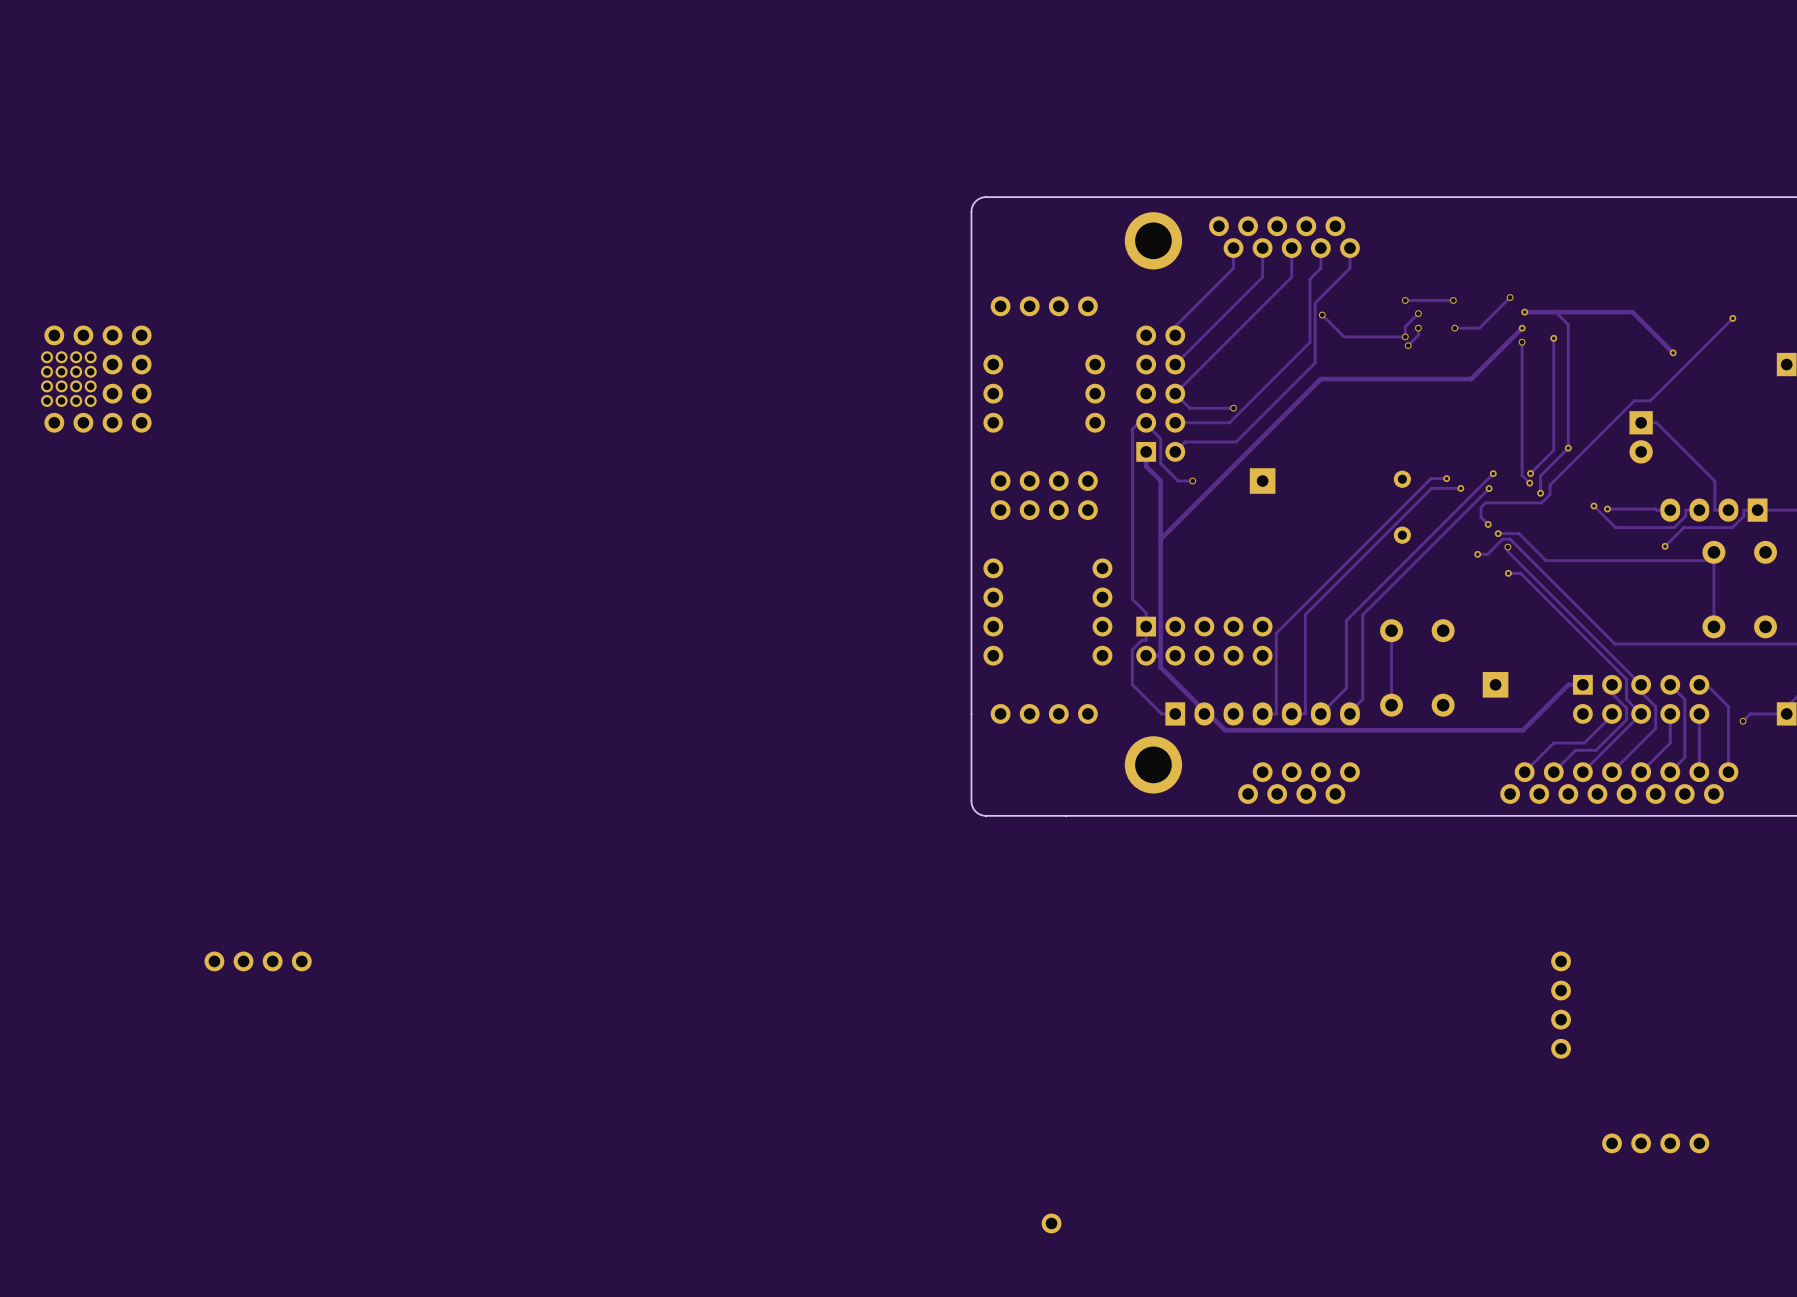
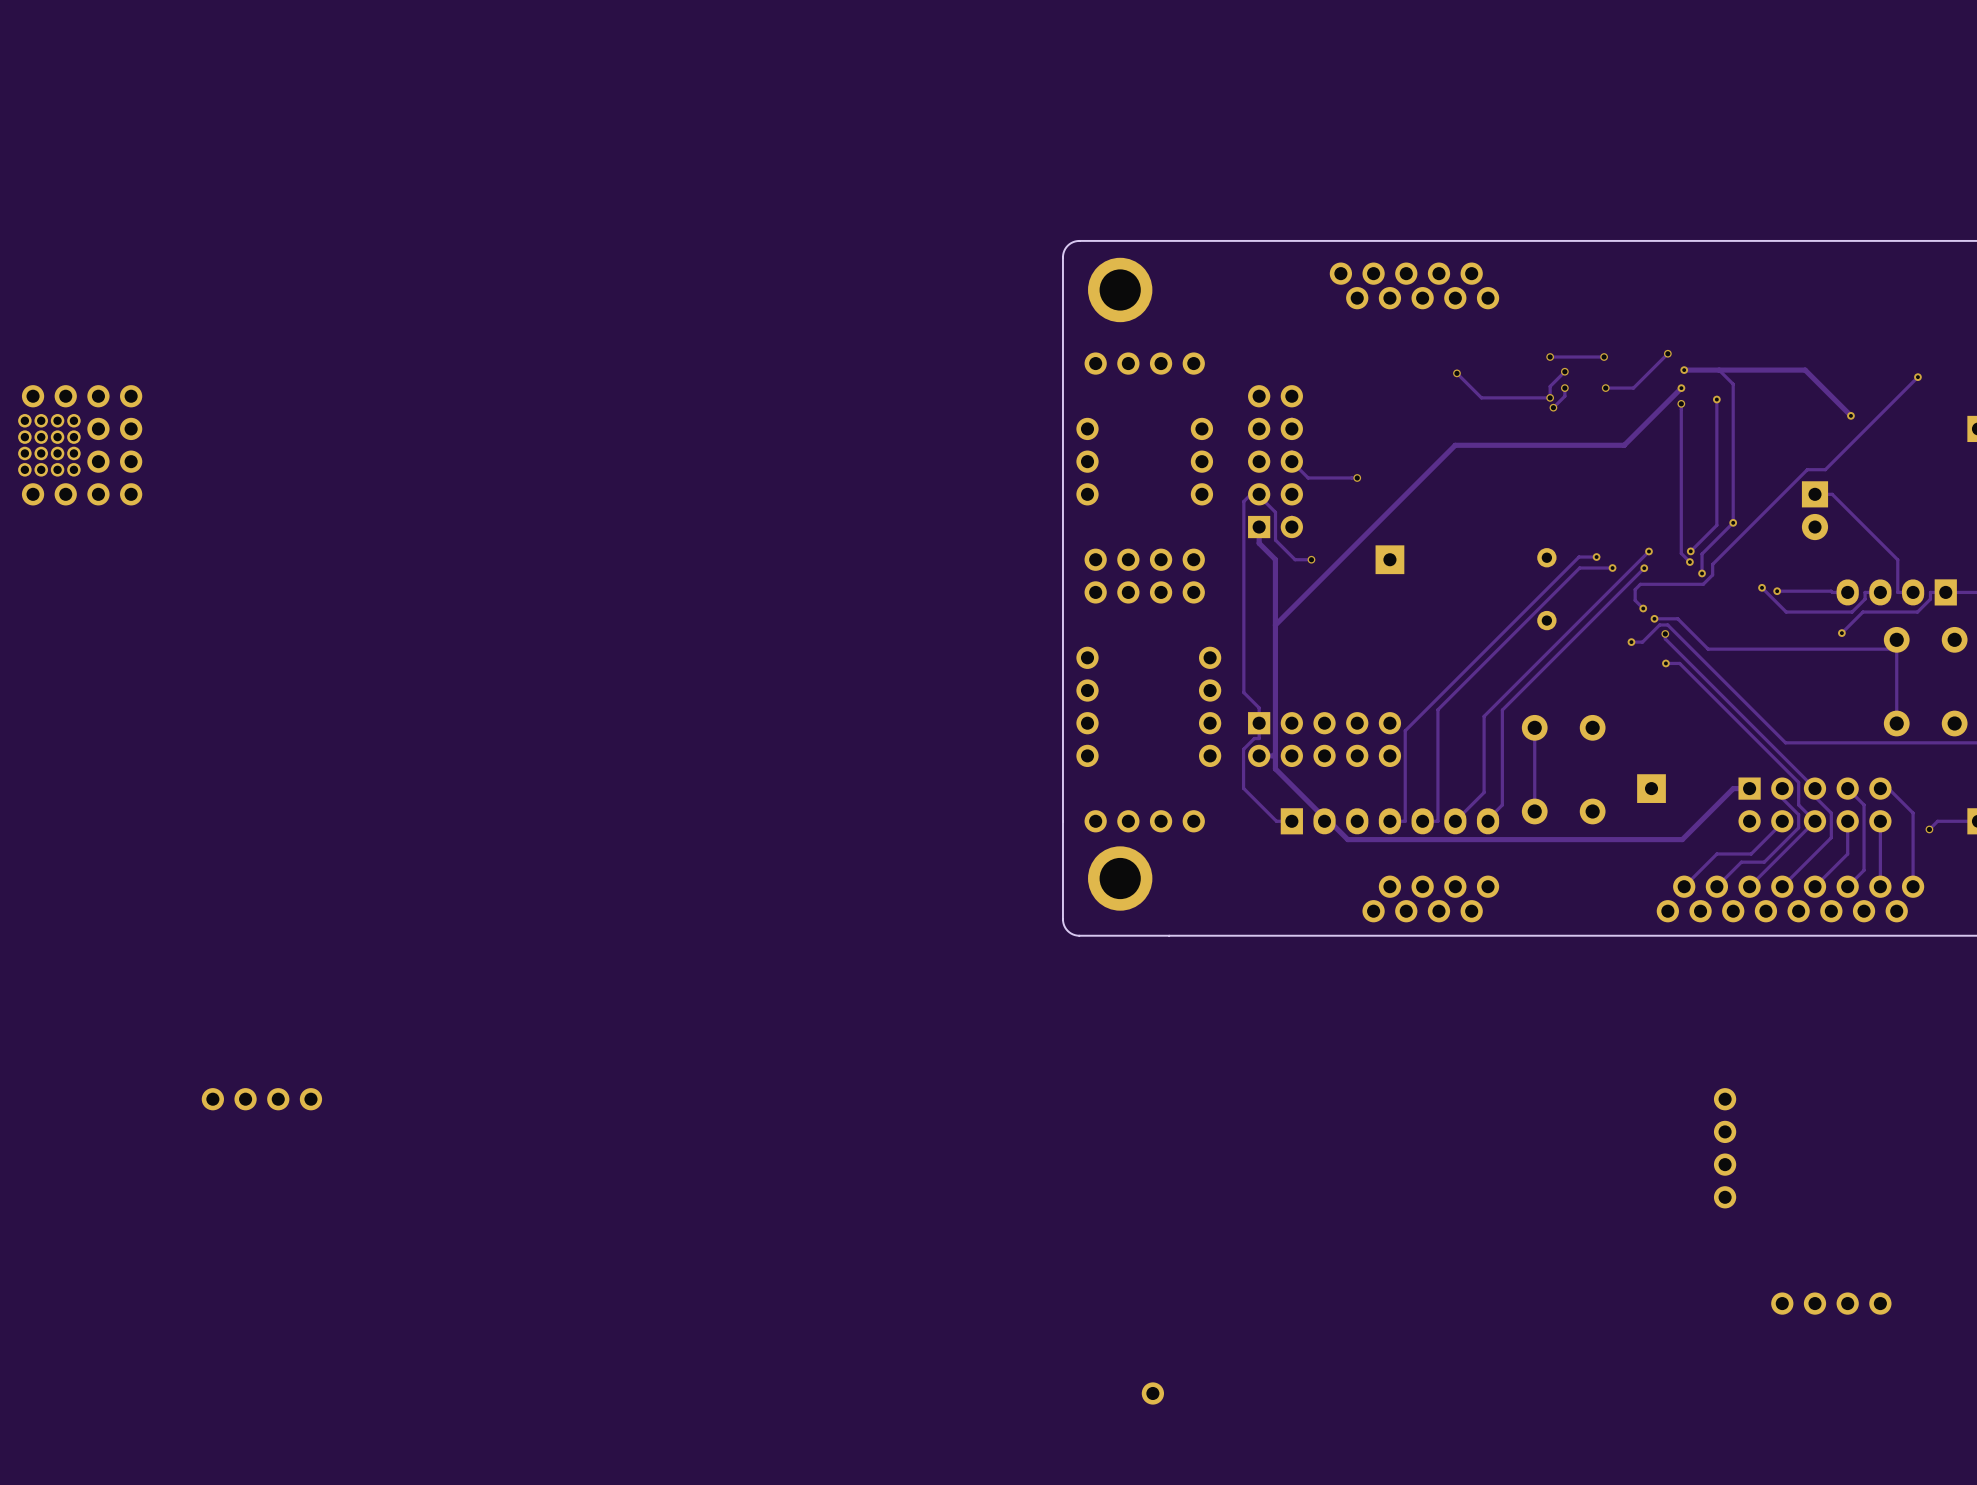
part position: (1153, 240) -> (1120, 289)
track: (1233, 248) (1233, 268) (1175, 326) (1175, 335) -> none
track: (1262, 248) (1262, 277) (1175, 364) -> none
track: (1291, 248) (1291, 277) (1175, 393) -> none
track: (1320, 248) (1320, 268) (1310, 279) (1310, 342) (1229, 422) (1175, 422) -> none
track: (1349, 248) (1349, 268) (1315, 303) (1315, 362) (1236, 441) (1185, 441) (1175, 451) -> none
part position: (1153, 764) -> (1120, 878)

